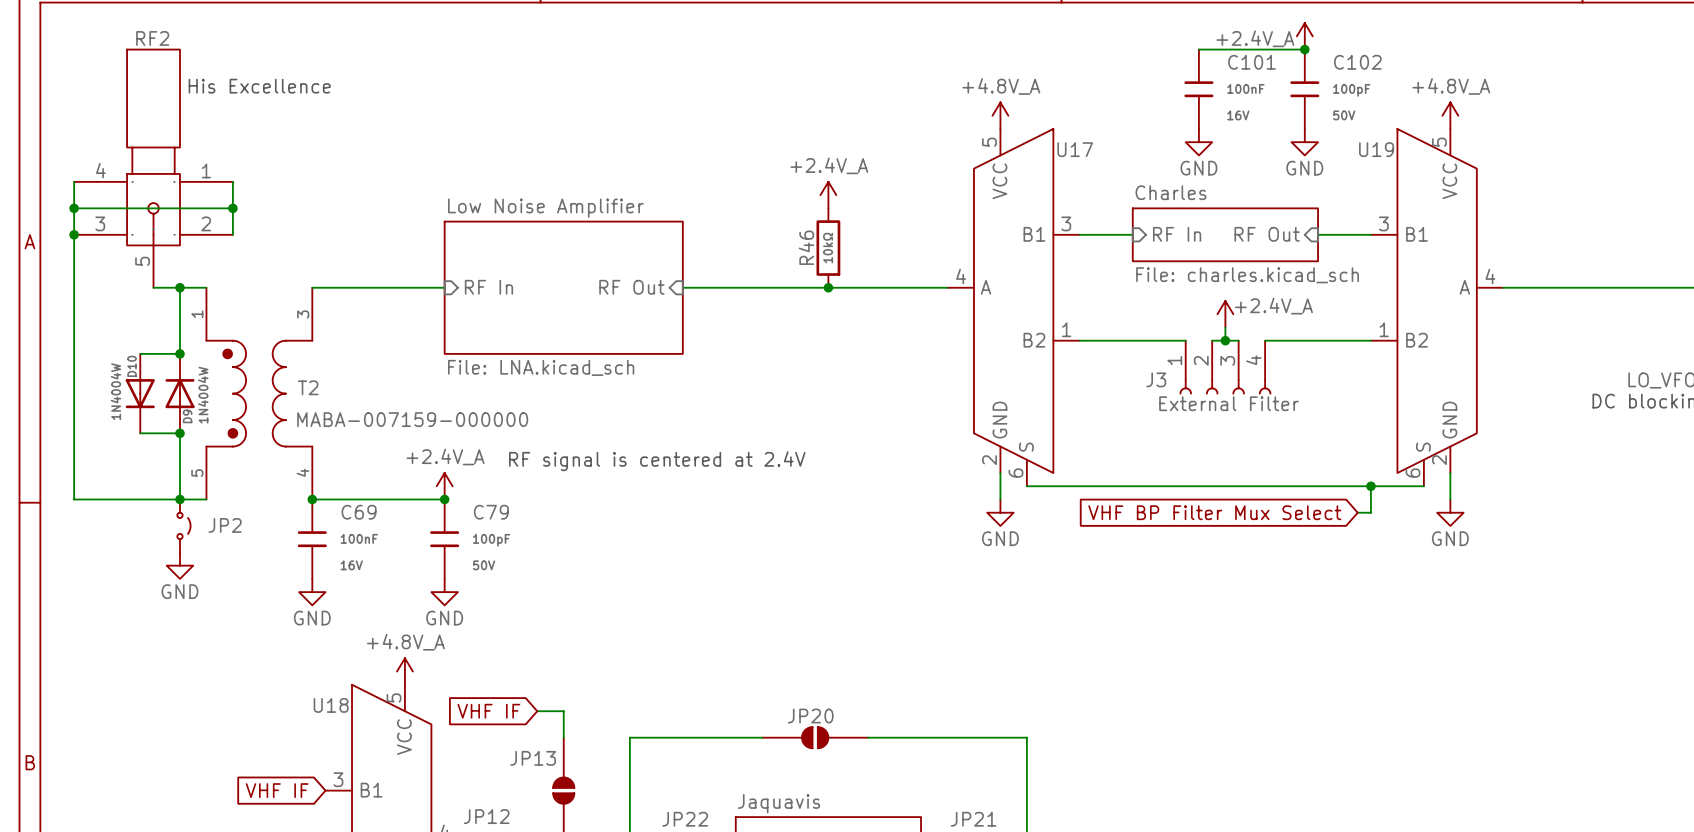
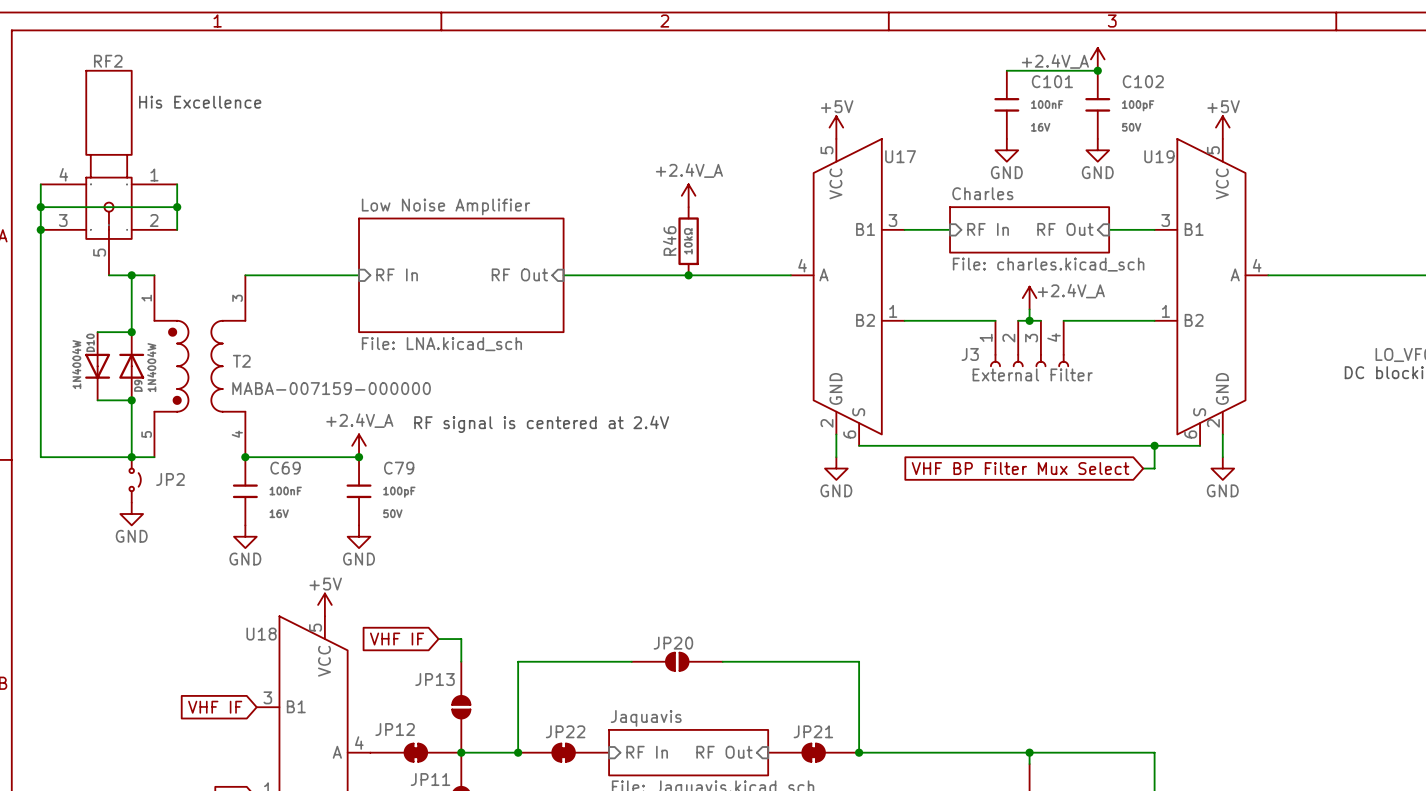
power symbol: +4.8V_A (1000, 115) -> +5V (836, 127)
power symbol: +4.8V_A (1450, 115) -> +5V (1222, 127)
power symbol: +4.8V_A (404, 671) -> +5V (324, 604)

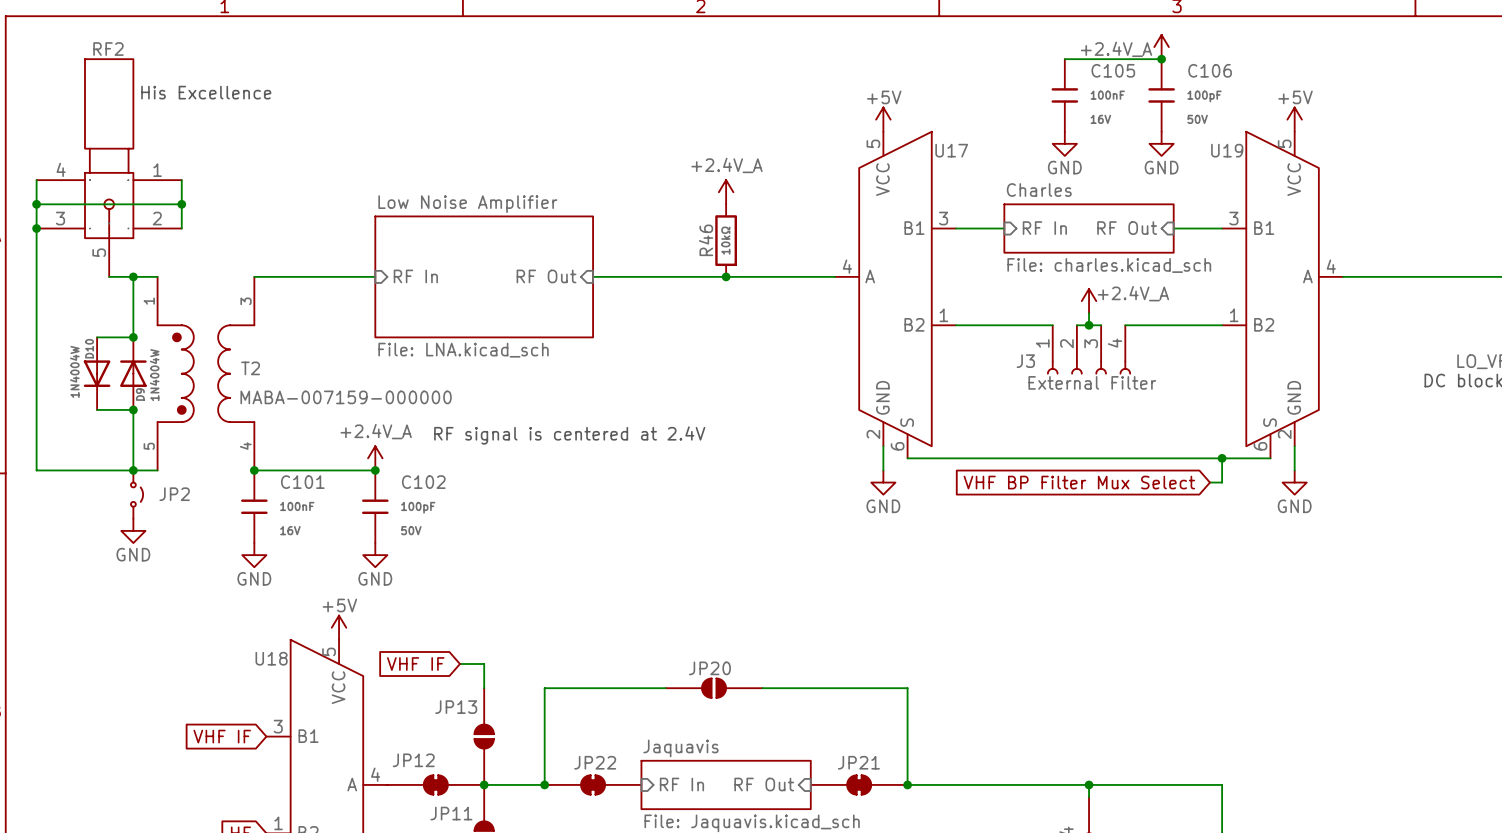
C101 name: C101 (1052, 81) -> C105 (1113, 70)
C102 name: C102 (1143, 81) -> C106 (1210, 70)
C69 name: C69 (285, 468) -> C101 (302, 482)
C79 name: C79 (399, 468) -> C102 (423, 482)

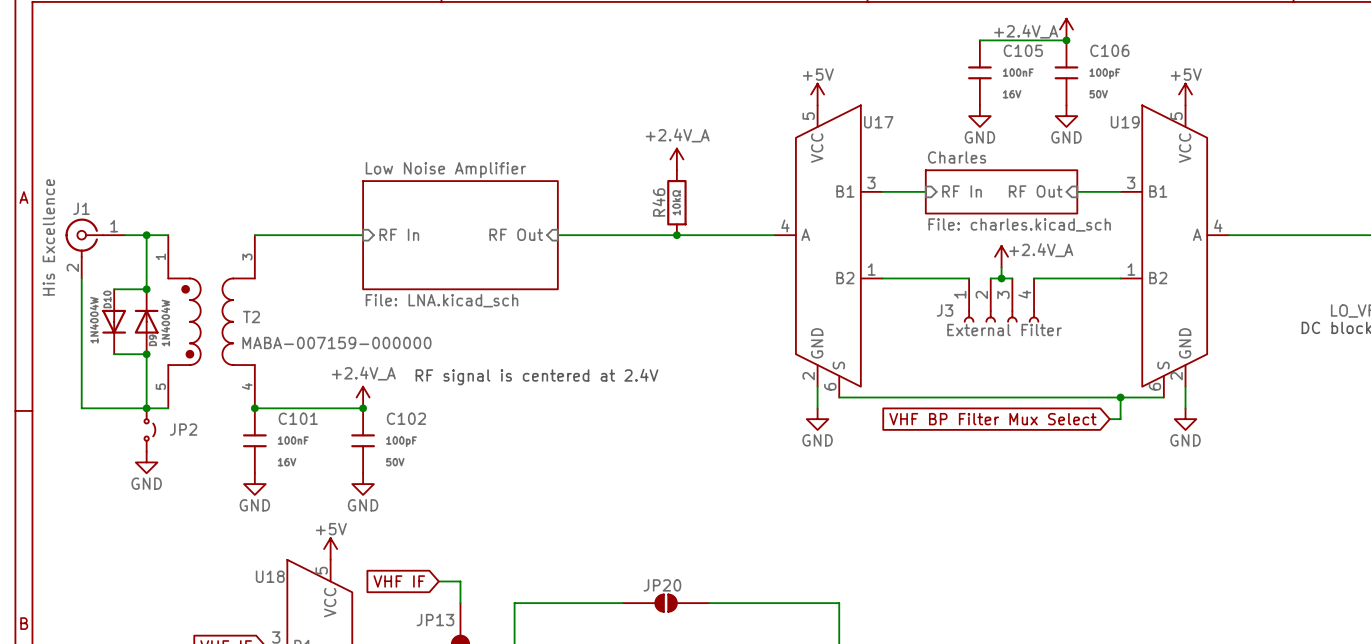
text: His Excellence (206, 92) -> none
RF2: (109, 168) -> none
wire: (36, 180) (36, 470) (60, 470) -> (81, 278) (81, 408)
wire: (181, 180) (181, 228) -> none
wire: (36, 204) (181, 204) -> none
junction: (36, 204) -> none
junction: (181, 204) -> none
junction: (36, 228) -> none
J1: none -> His Excellence (95, 248)

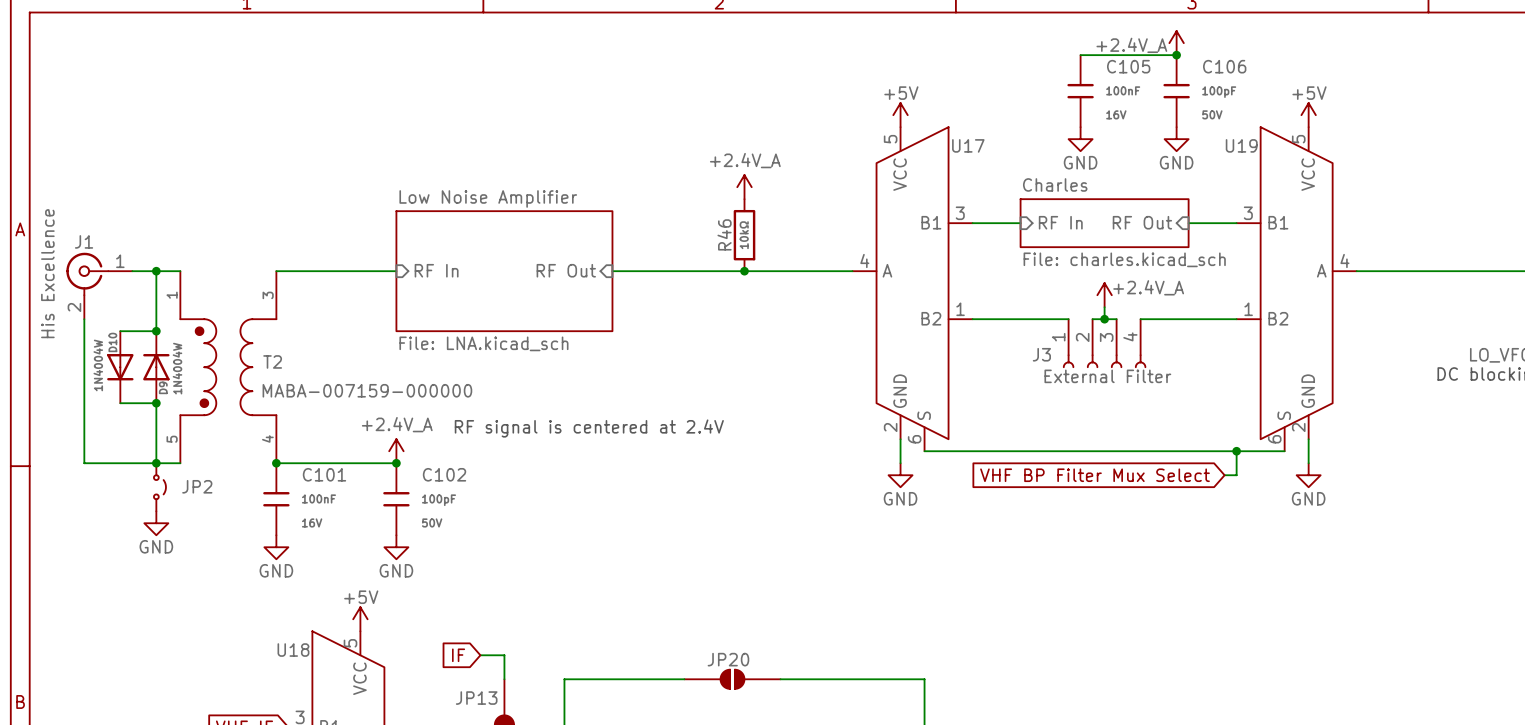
global label: VHF IF (399, 581) -> IF (458, 655)

